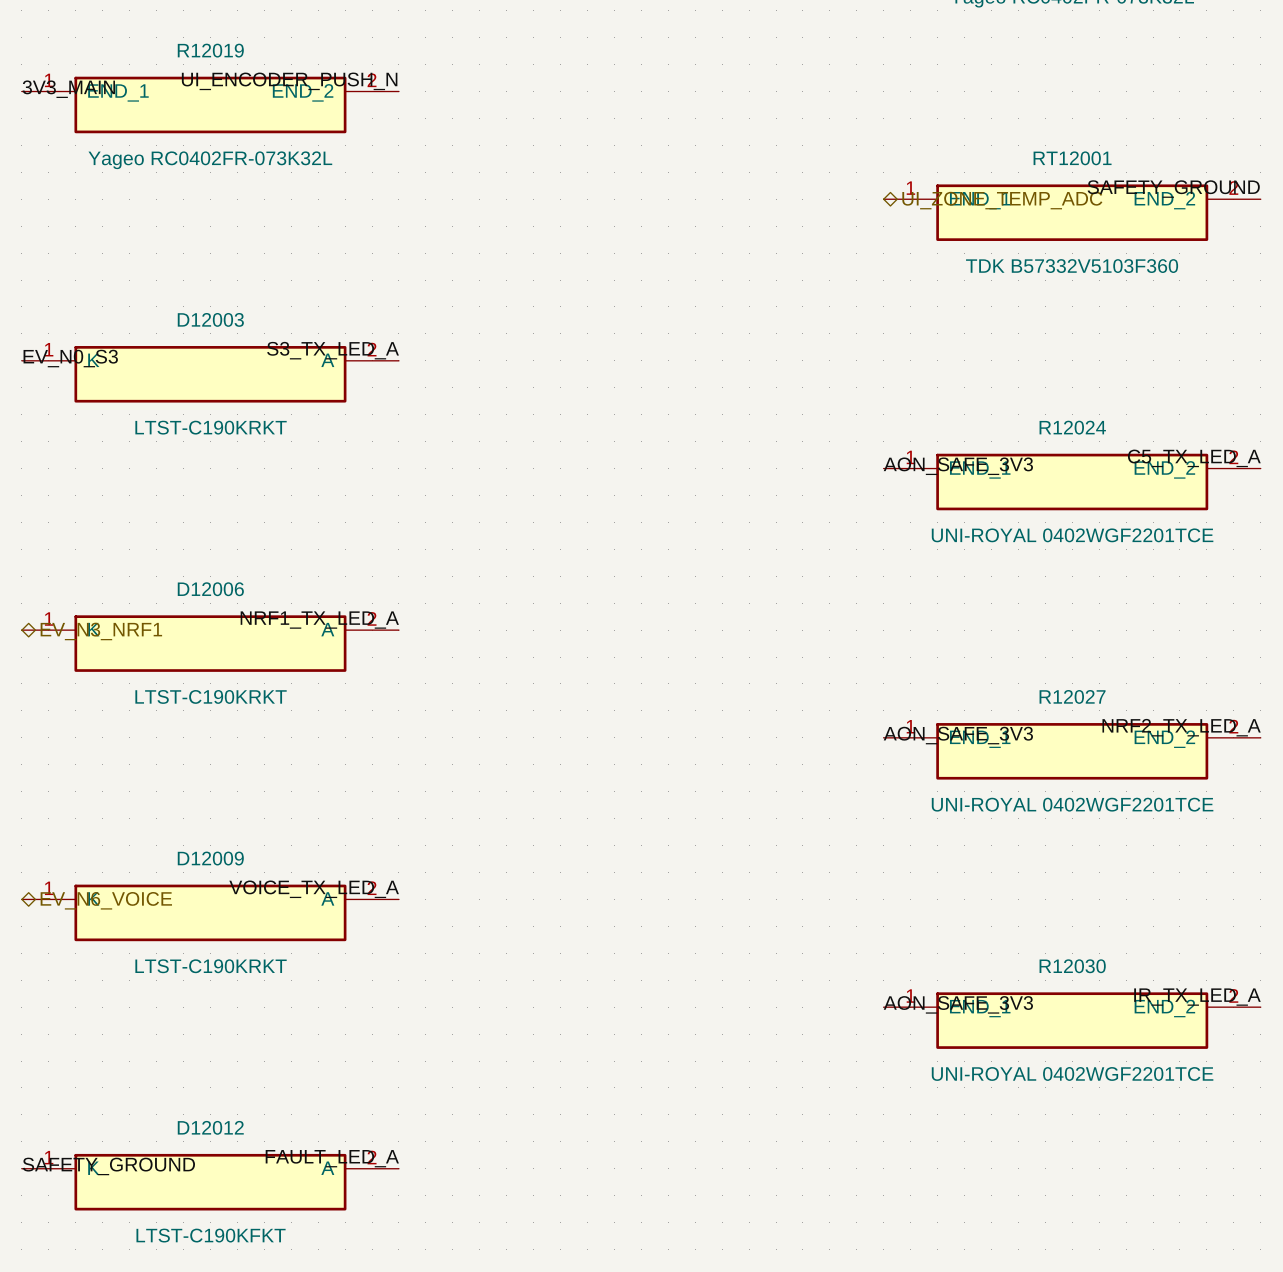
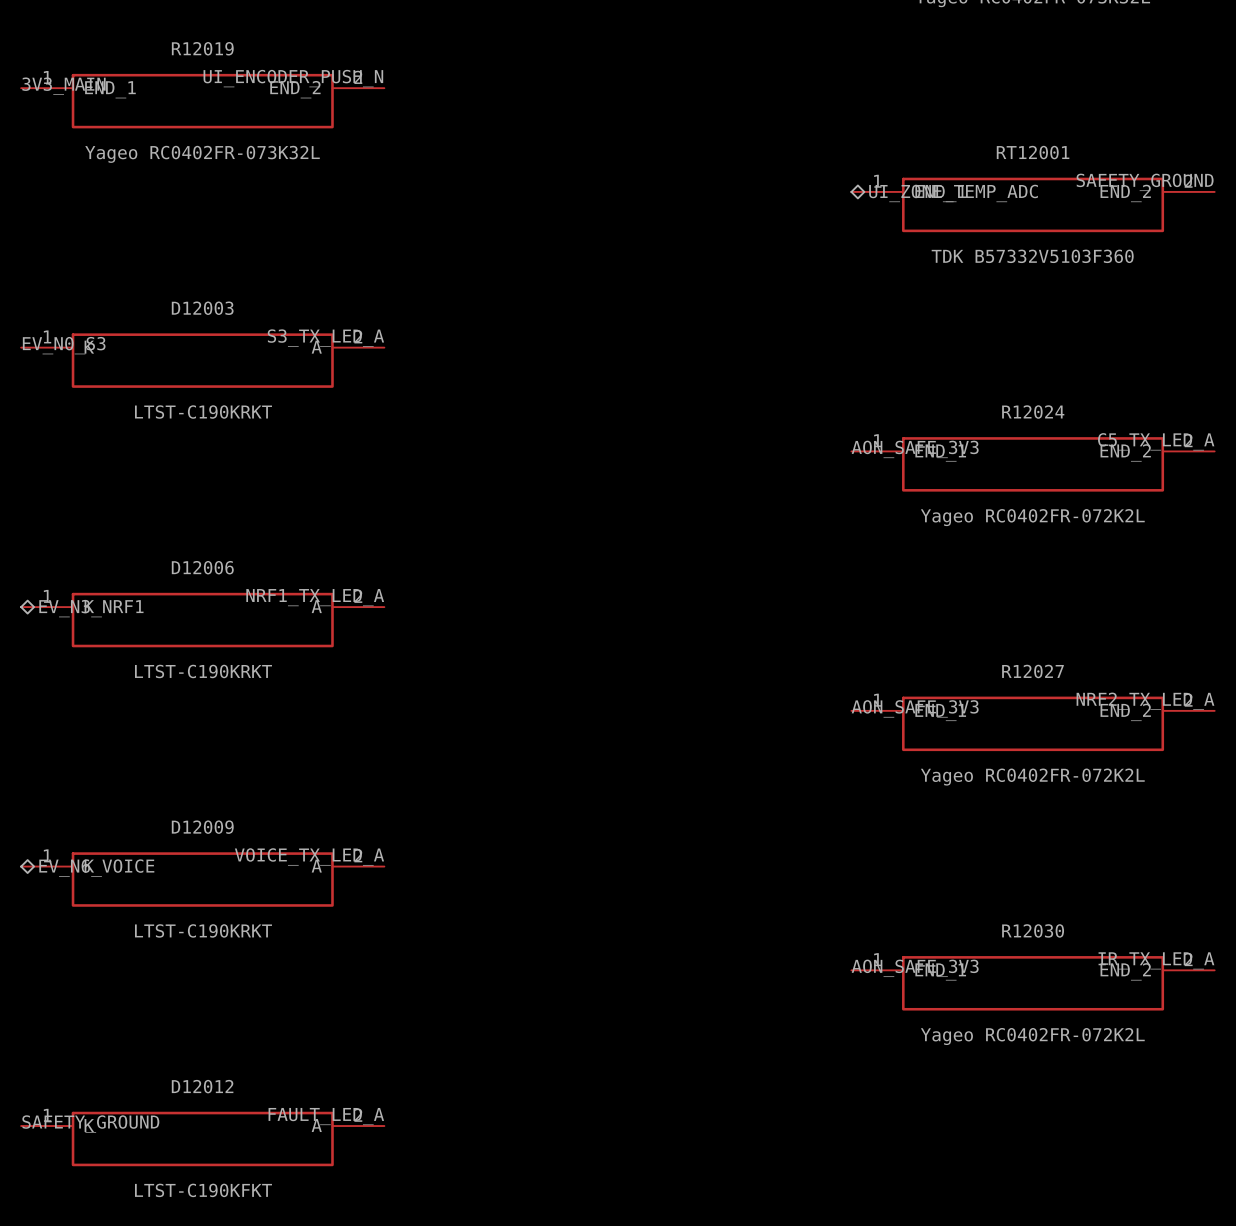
R12024 value: UNI-ROYAL 0402WGF2201TCE (1072, 535) -> Yageo RC0402FR-072K2L (1032, 517)
R12027 value: UNI-ROYAL 0402WGF2201TCE (1072, 804) -> Yageo RC0402FR-072K2L (1032, 777)
R12030 value: UNI-ROYAL 0402WGF2201TCE (1072, 1073) -> Yageo RC0402FR-072K2L (1032, 1036)

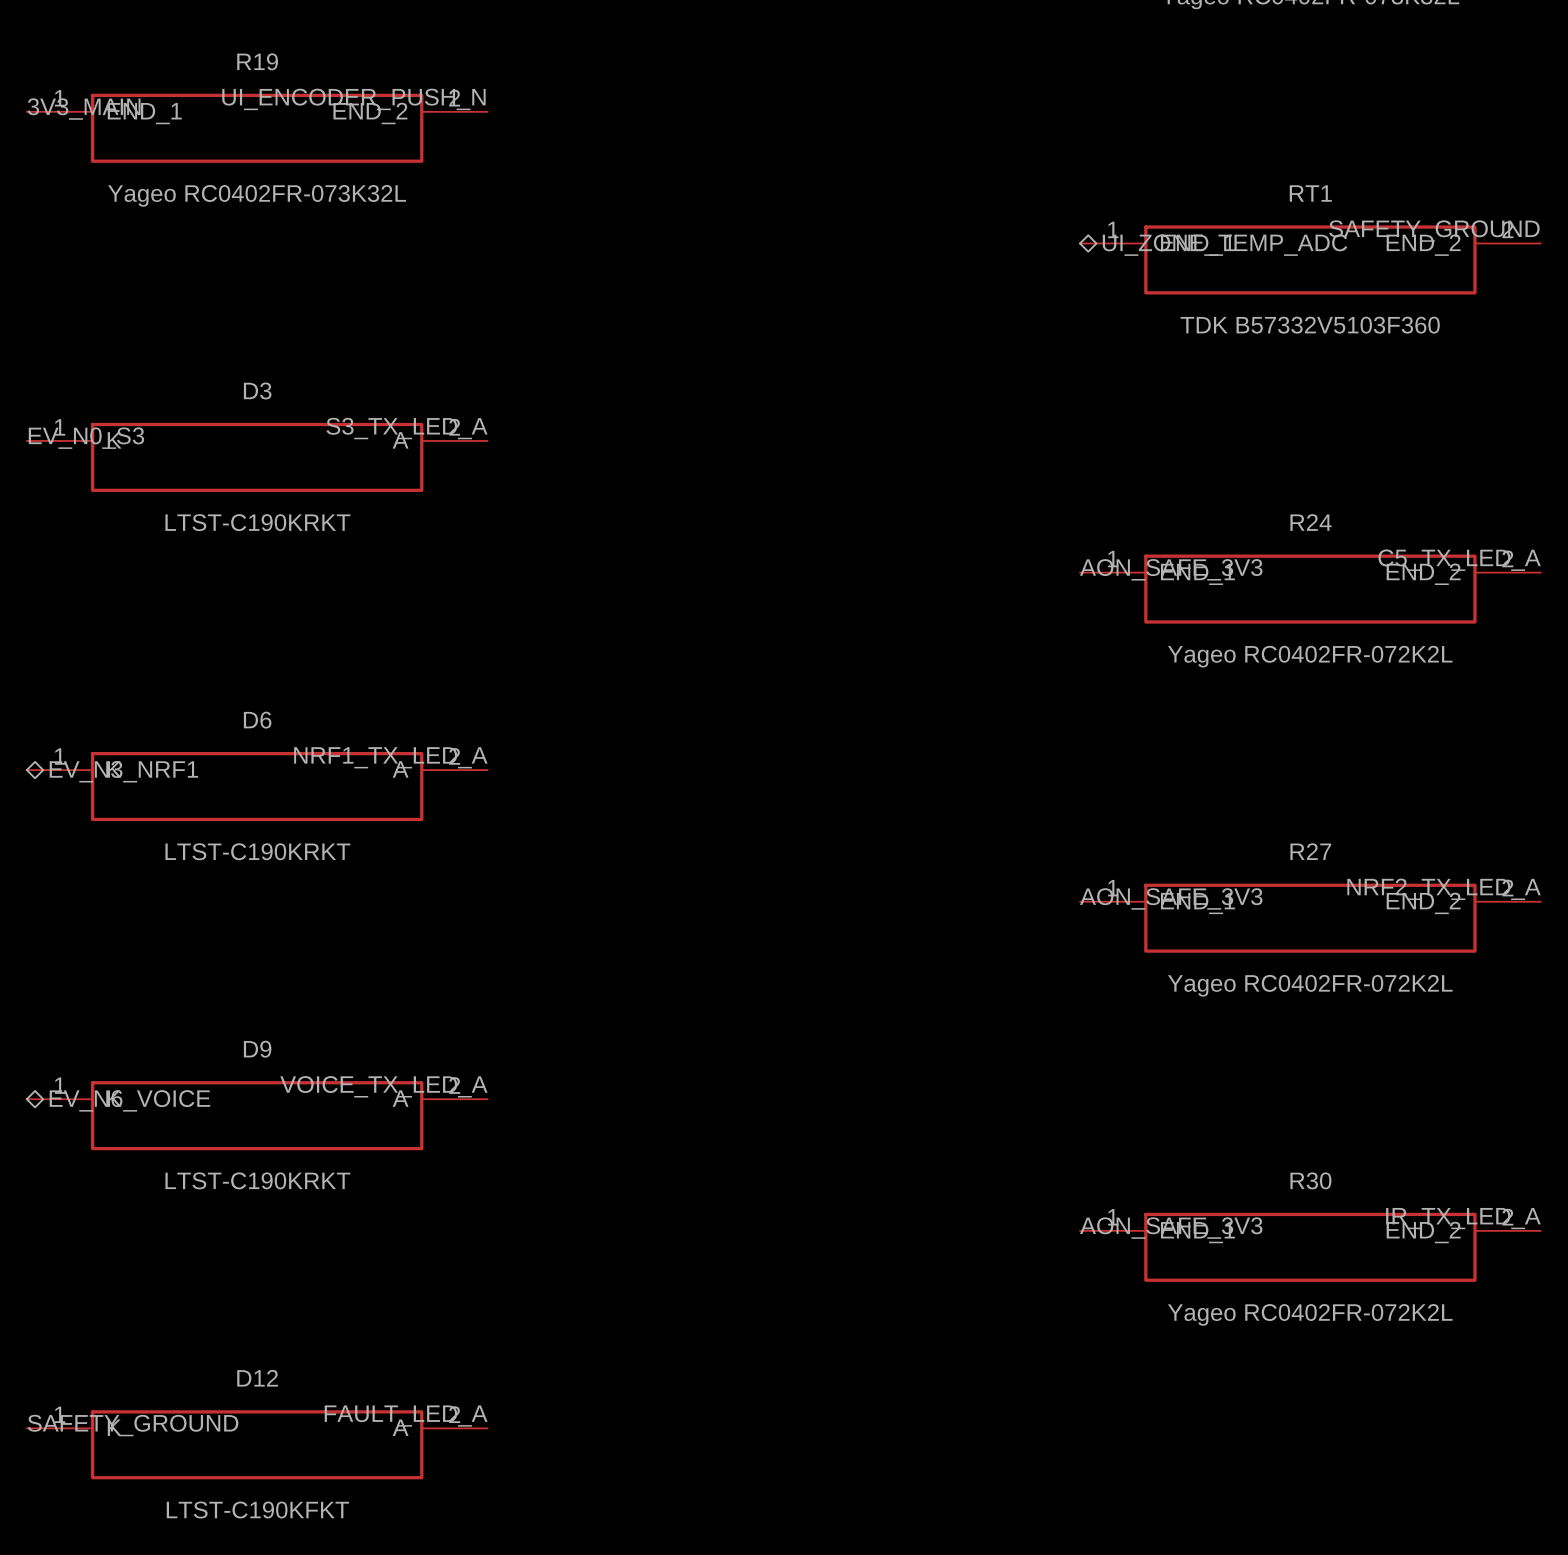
R12019 name: R12019 (202, 48) -> R19 (257, 61)
RT12001 name: RT12001 (1033, 152) -> RT1 (1310, 193)
D12003 name: D12003 (202, 308) -> D3 (257, 390)
R12024 name: R12024 (1033, 412) -> R24 (1311, 522)
D12006 name: D12006 (202, 567) -> D6 (257, 720)
R12027 name: R12027 (1032, 671) -> R27 (1310, 851)
D12009 name: D12009 (202, 827) -> D9 (257, 1049)
R12030 name: R12030 (1033, 930) -> R30 (1310, 1180)
D12012 name: D12012 (202, 1086) -> D12 (257, 1378)

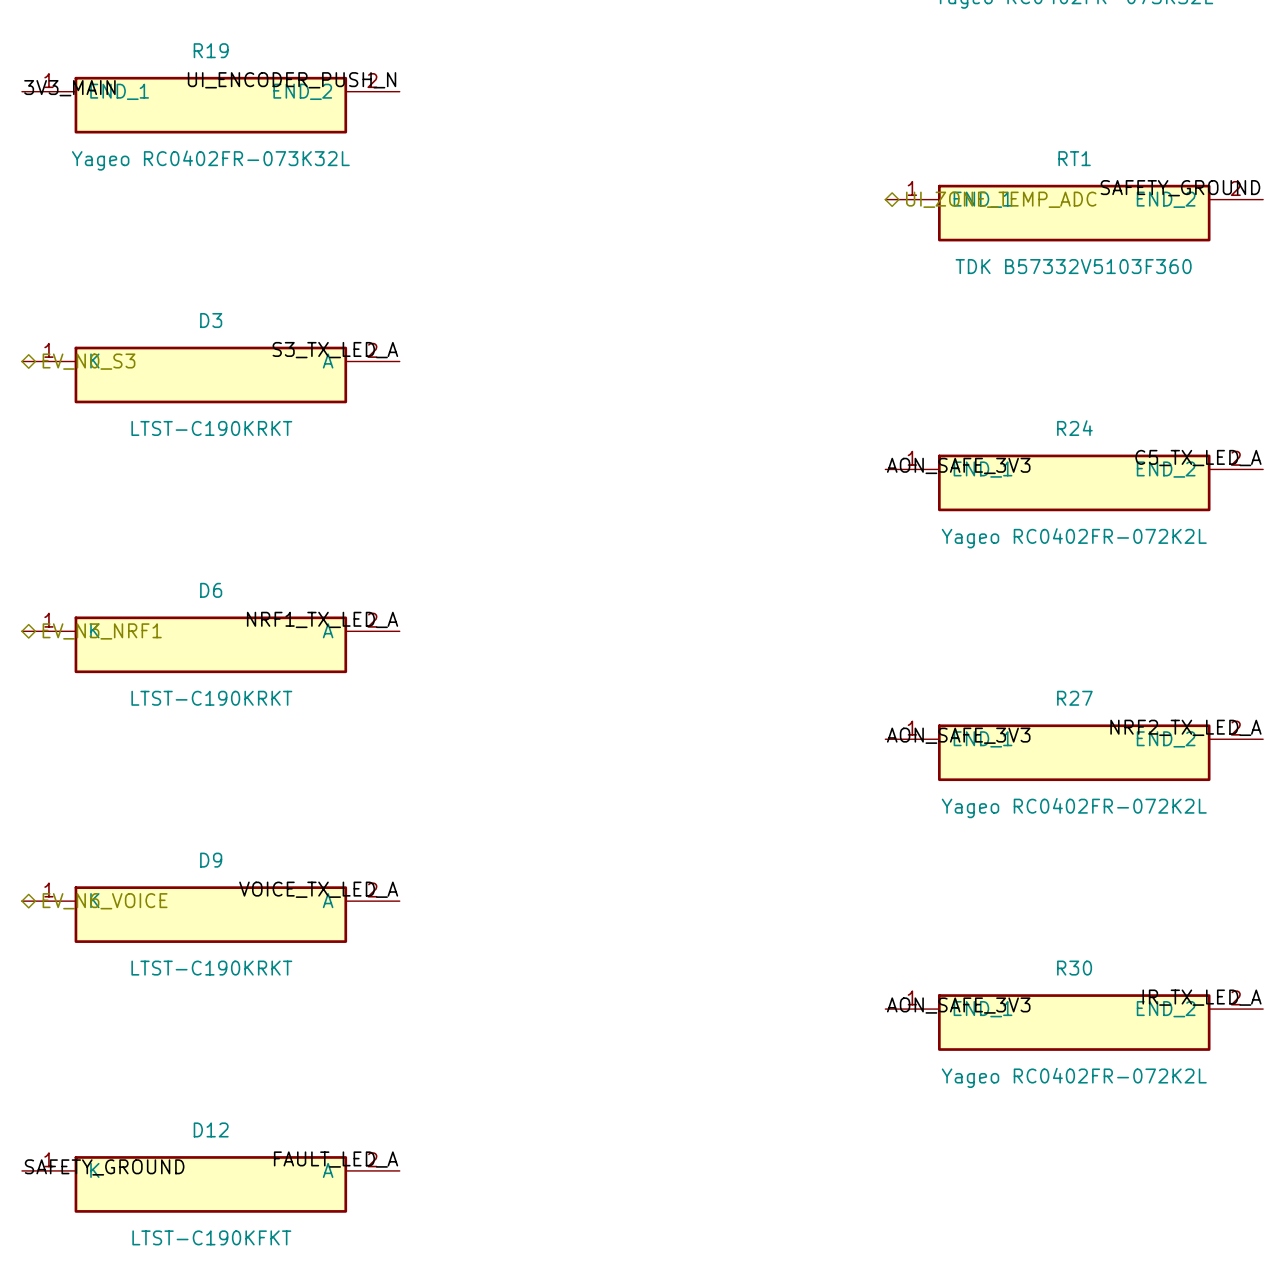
label: EV_N0_S3 (86, 438) -> none
hierarchical label: none -> EV_N0_S3 (89, 361)

